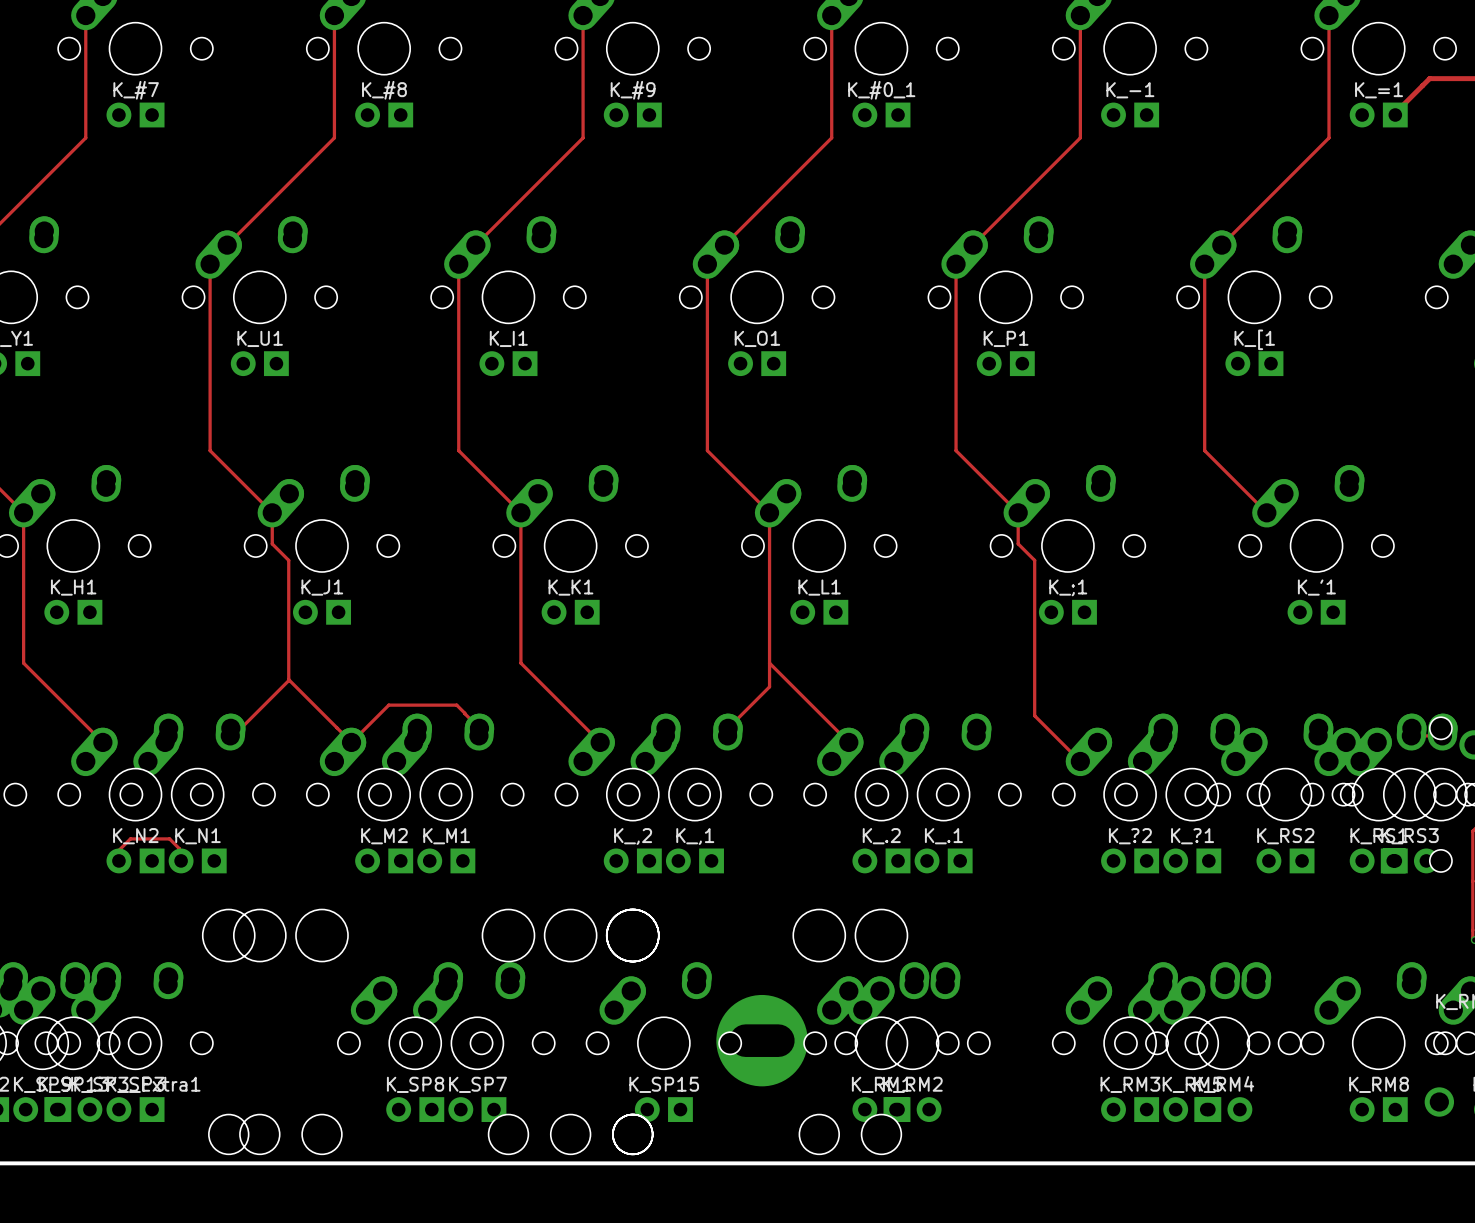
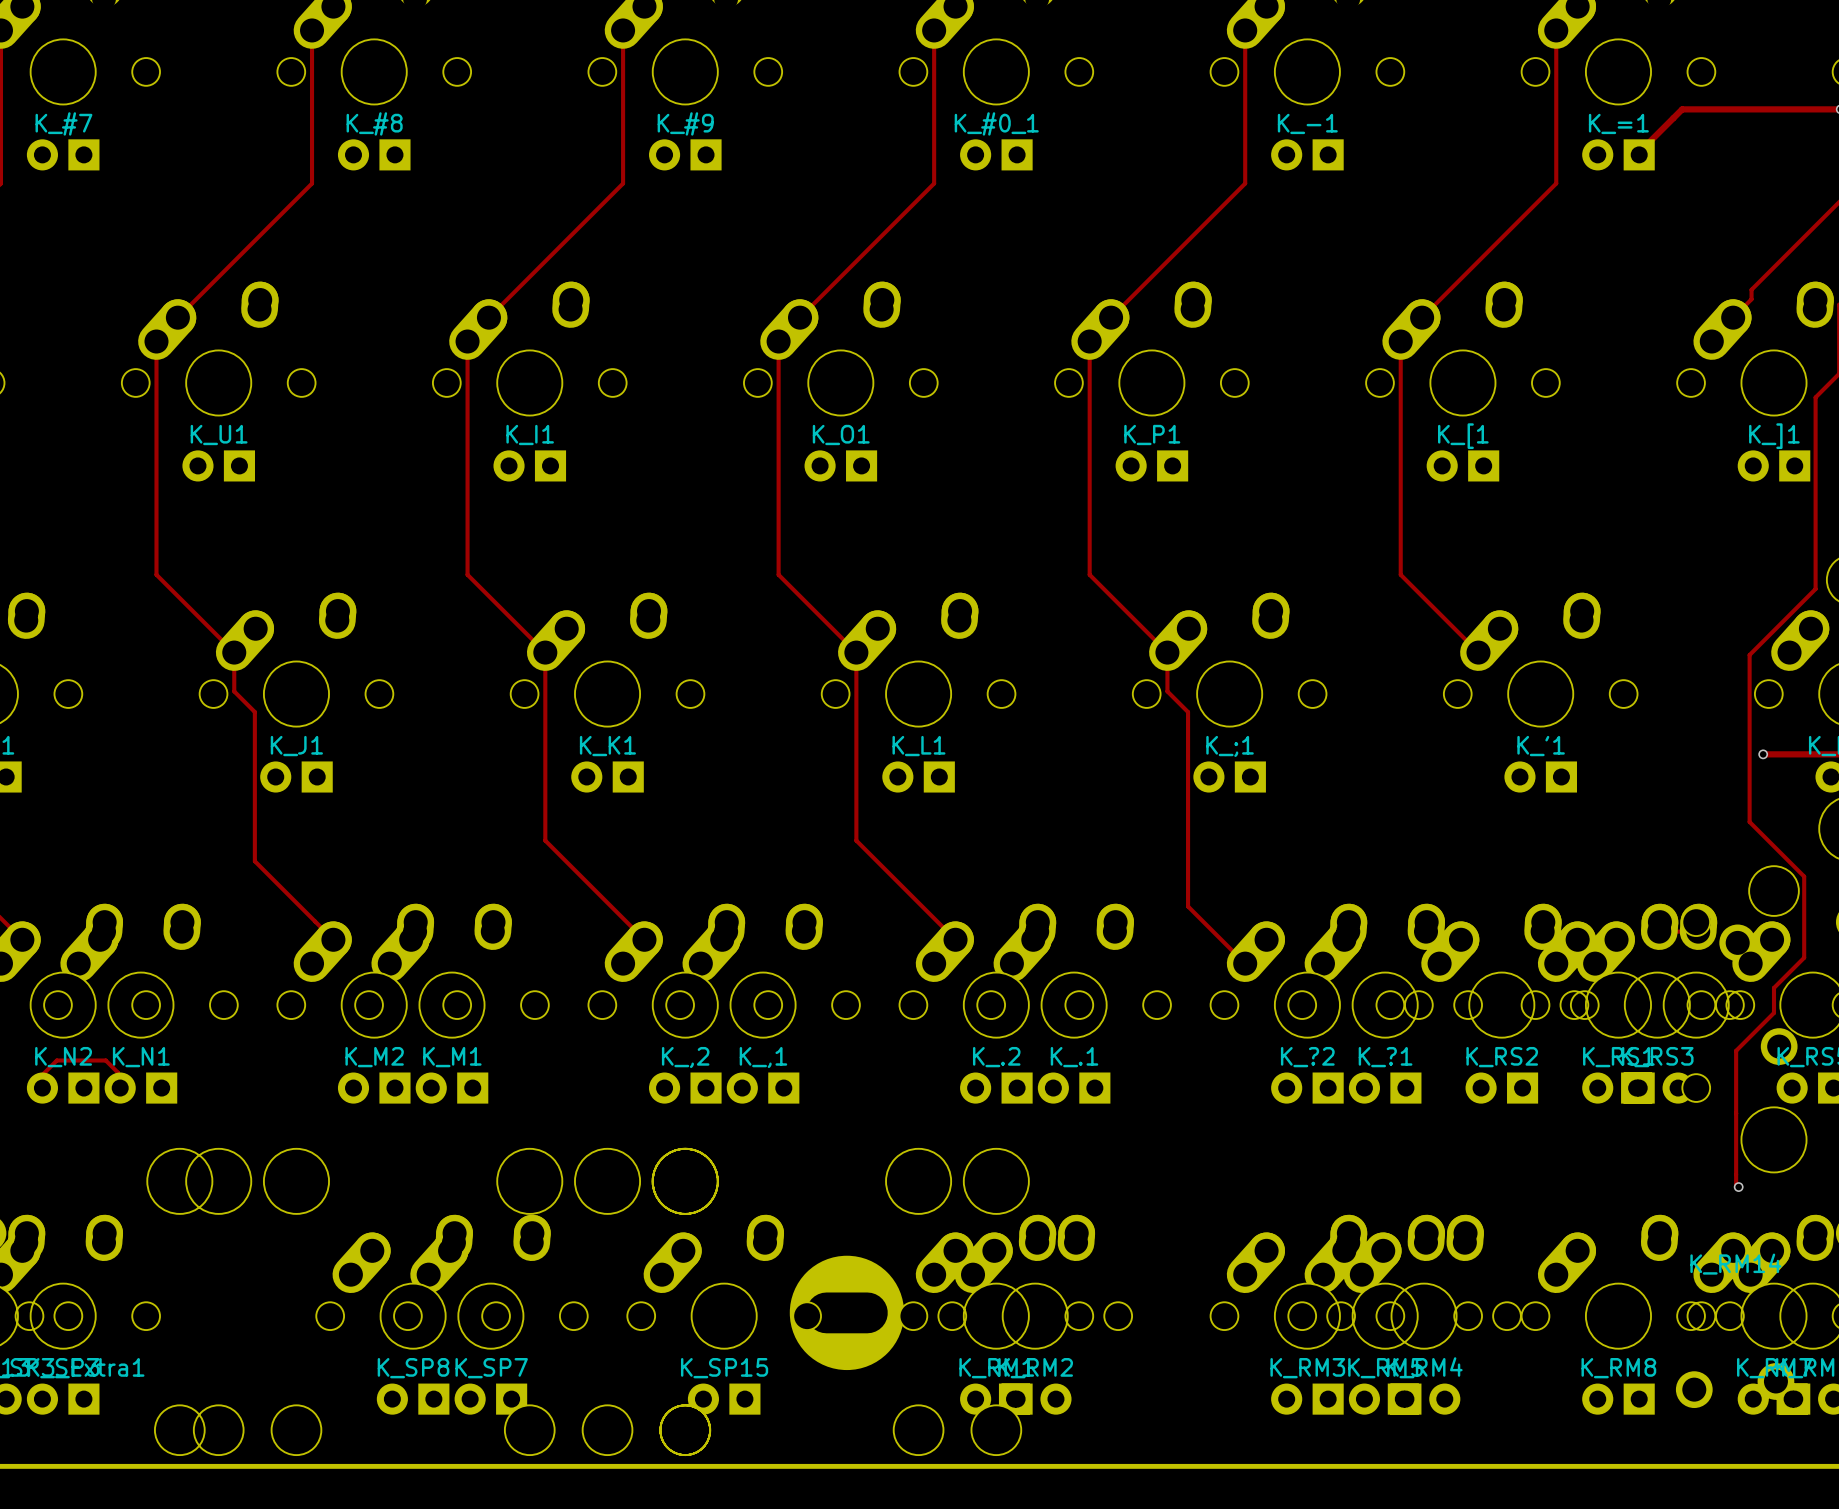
track: (769, 663) (769, 686) (728, 728) -> none
track: (288, 679) (241, 728) (230, 728) -> none
track: (479, 728) (456, 705) (388, 705) (351, 742) -> none

